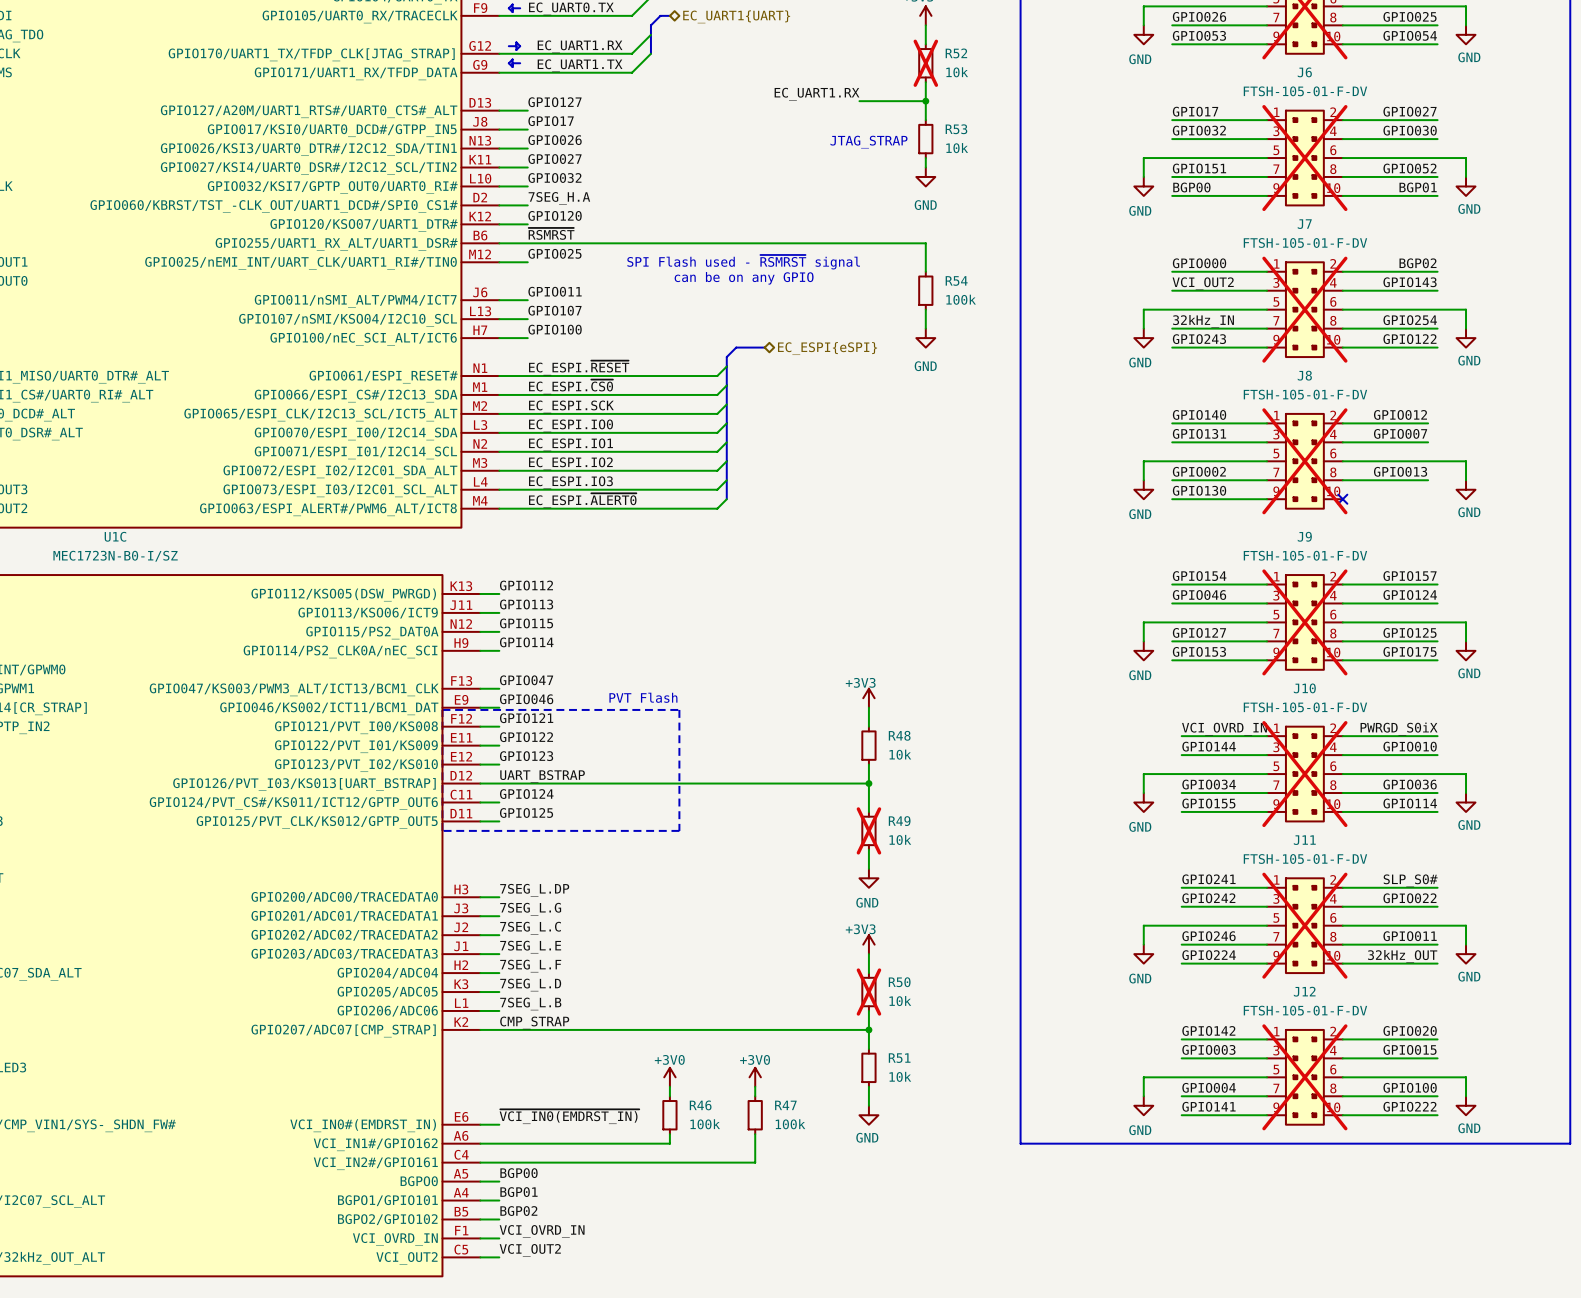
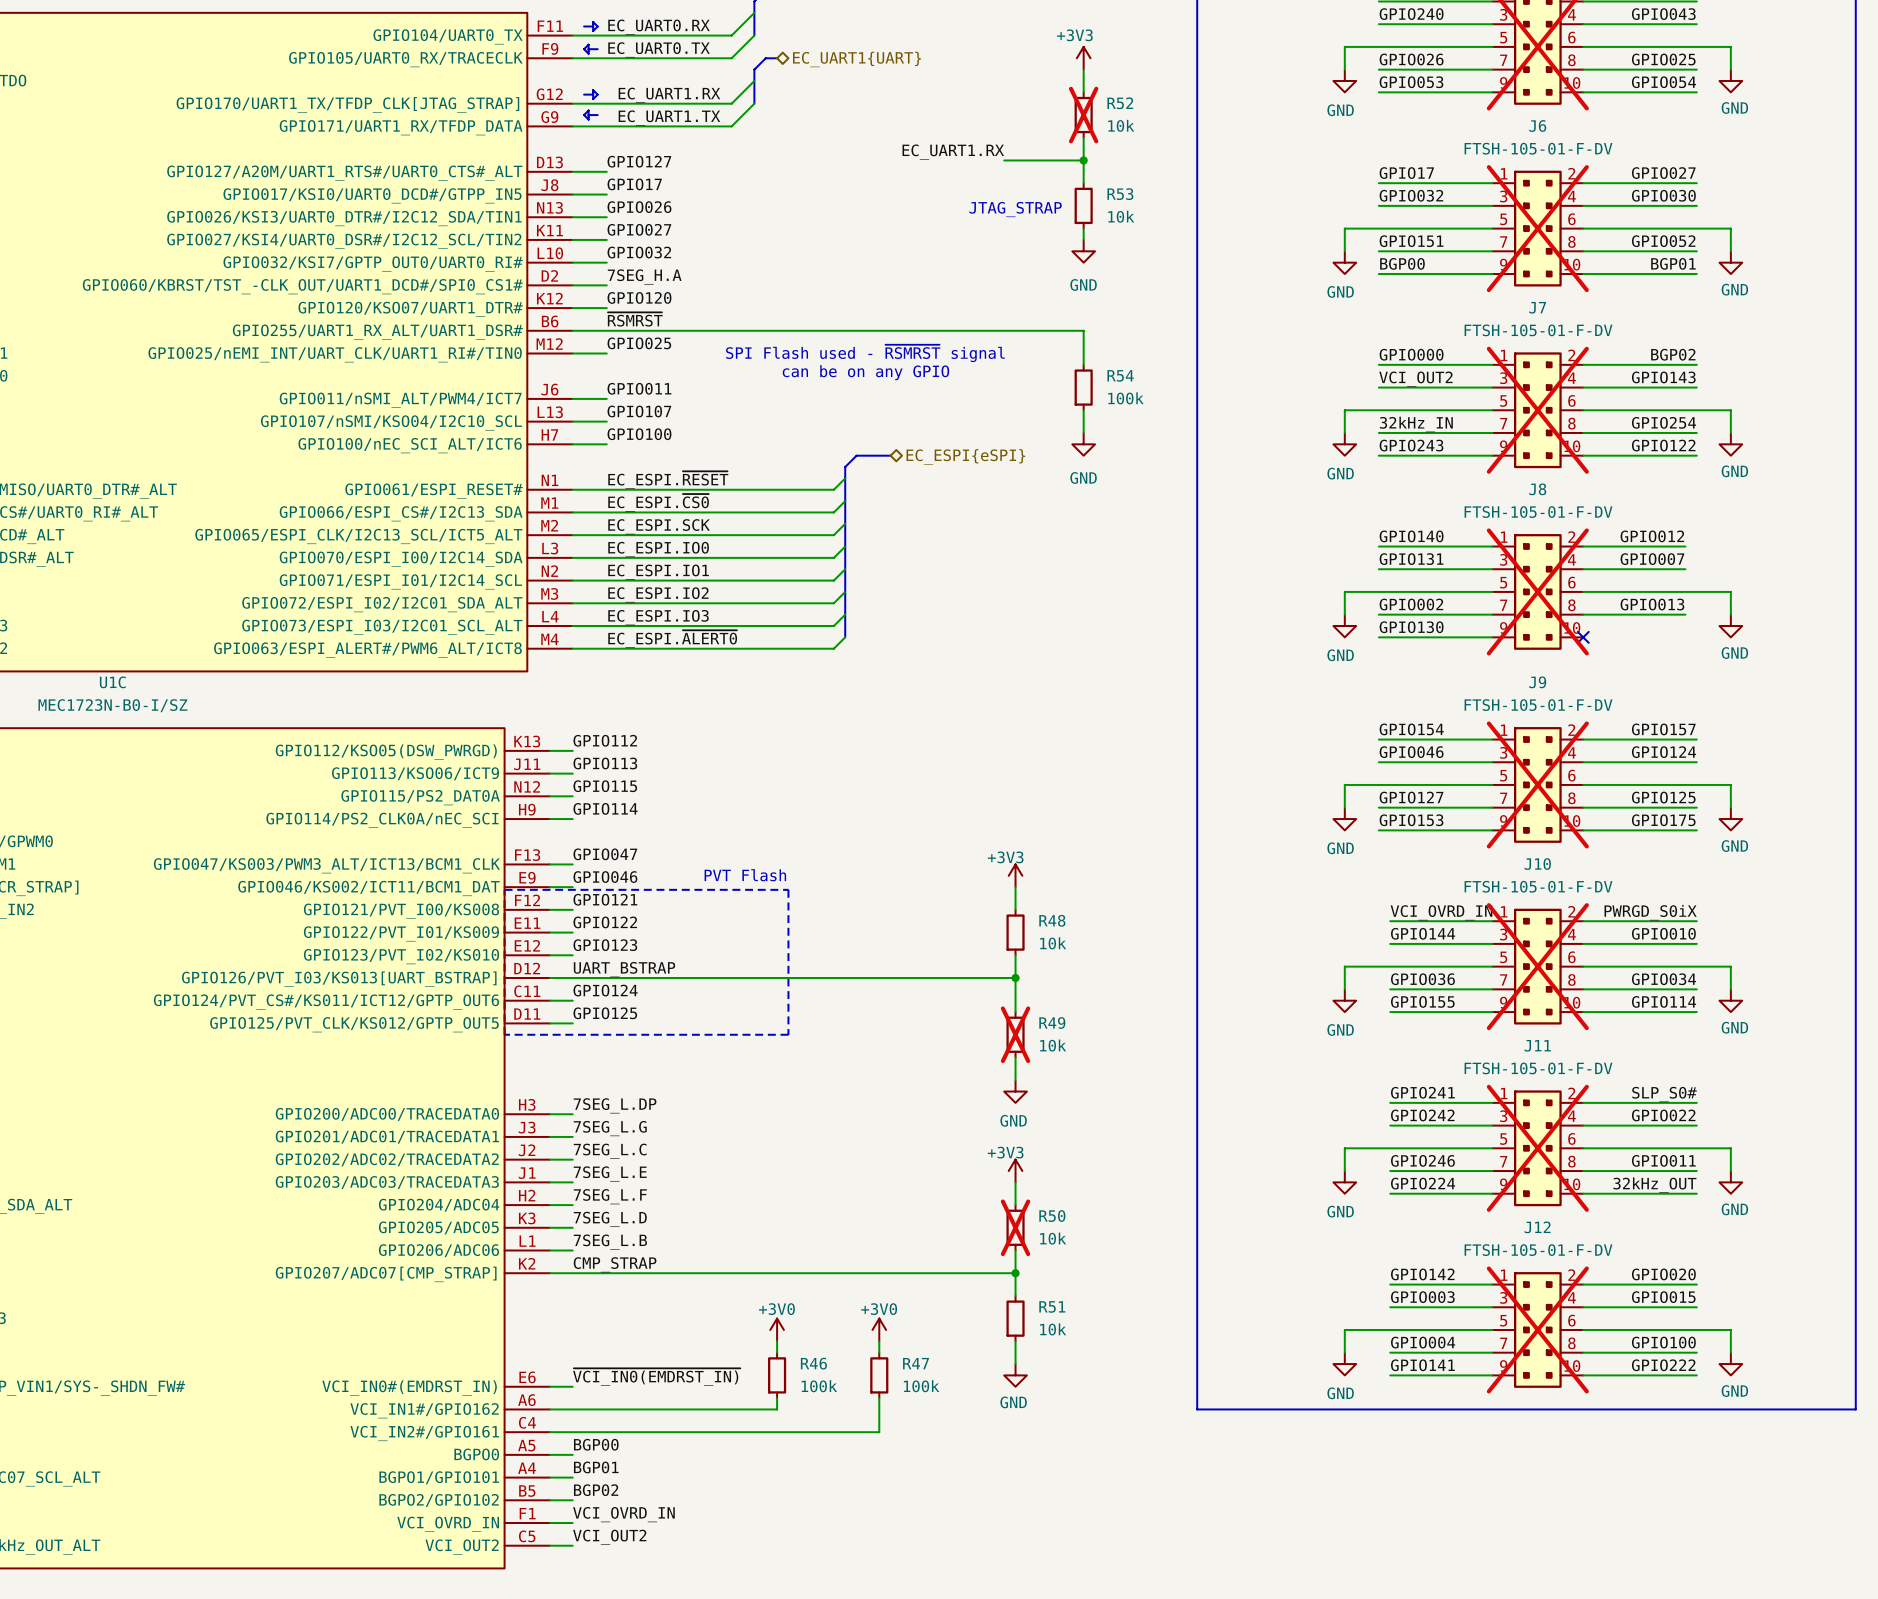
label: GPIO034 (1209, 784) -> GPIO036 (1422, 979)
label: GPIO036 (1410, 784) -> GPIO034 (1664, 979)

